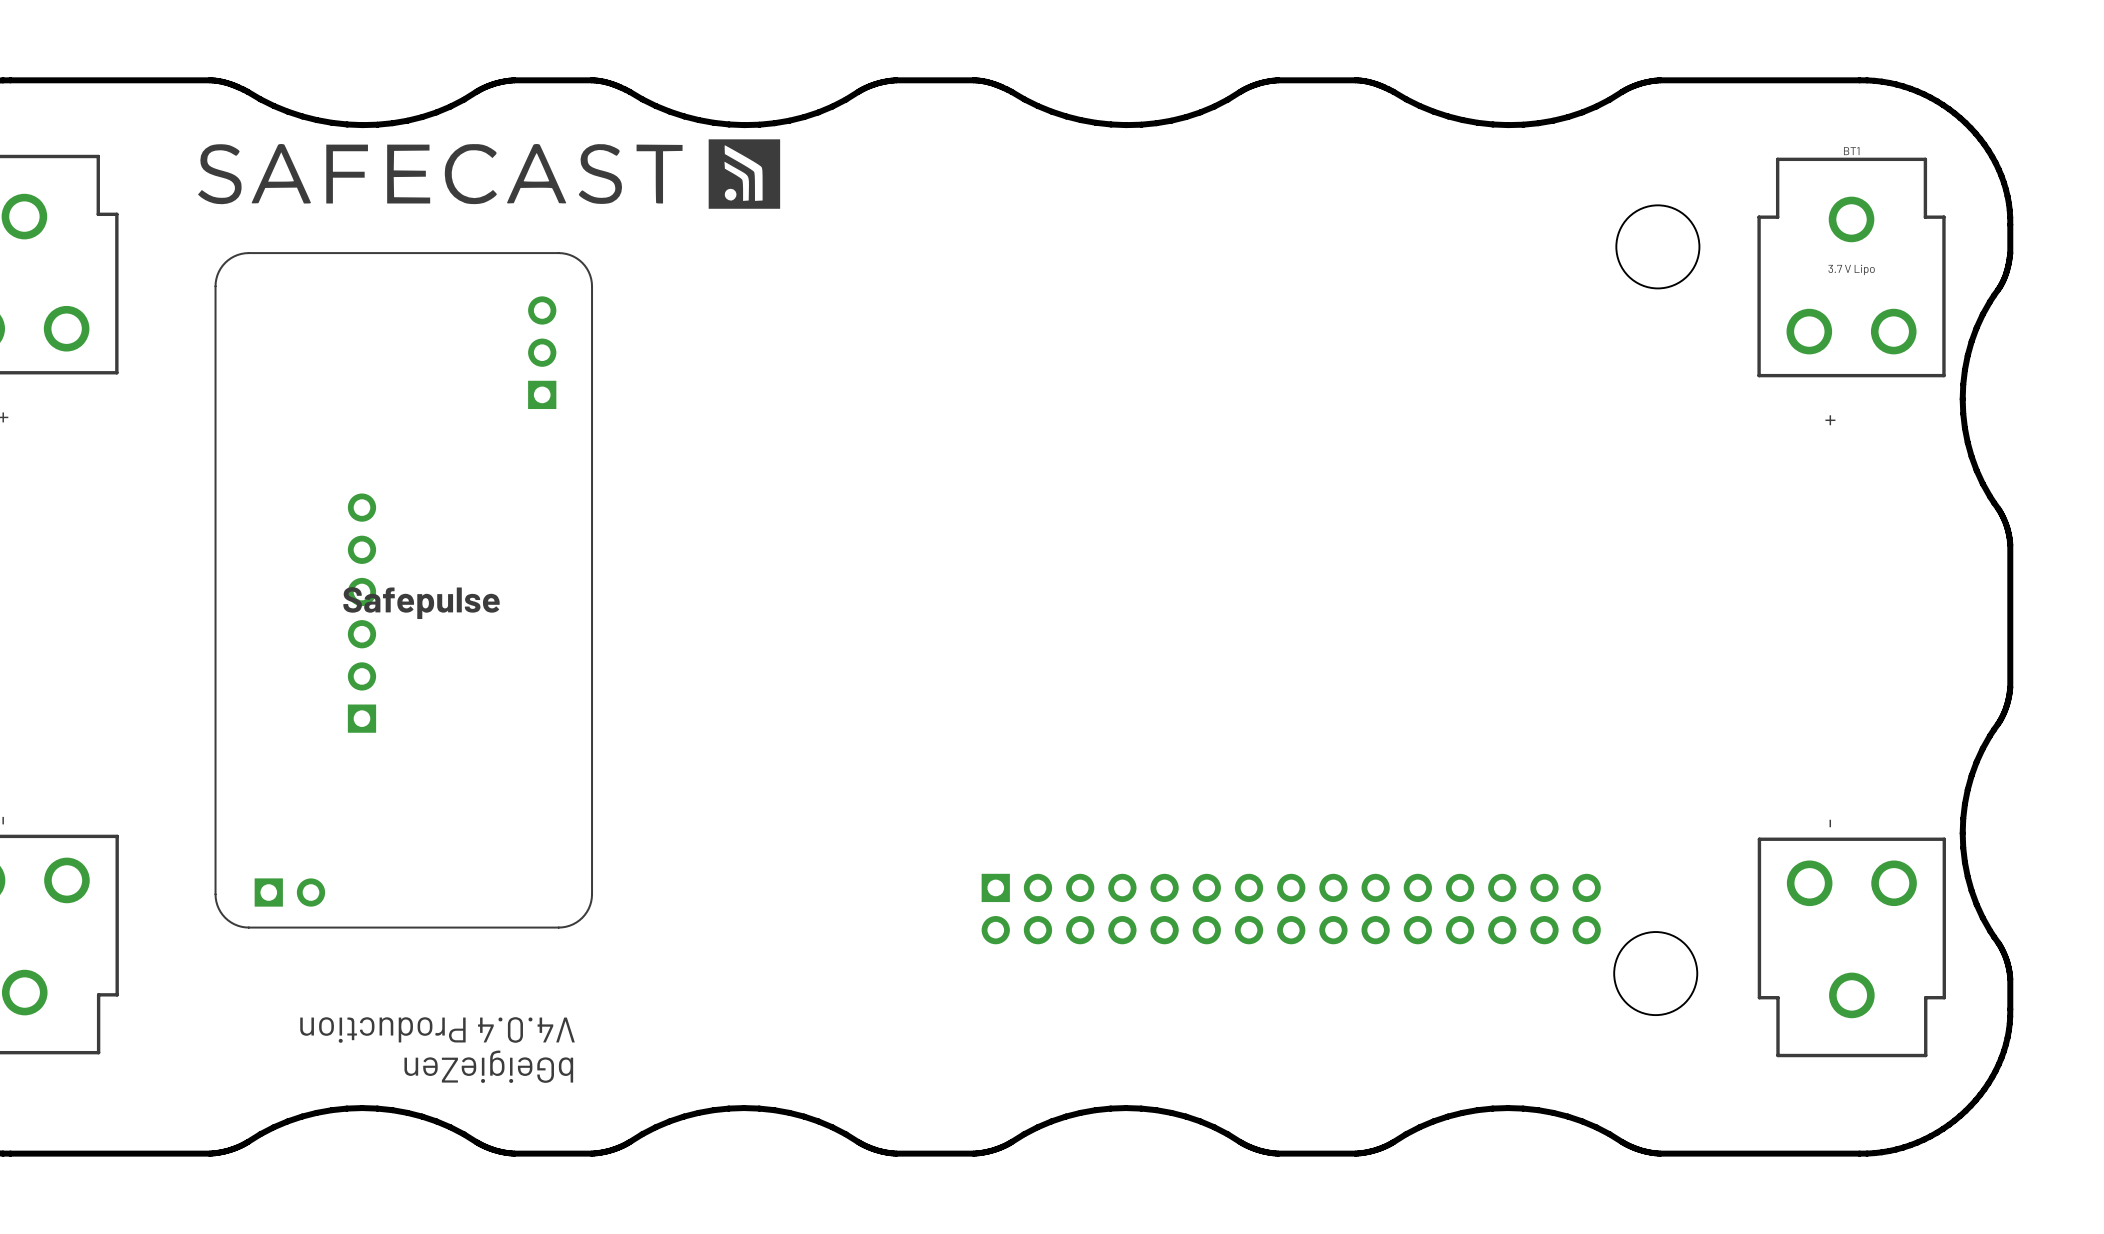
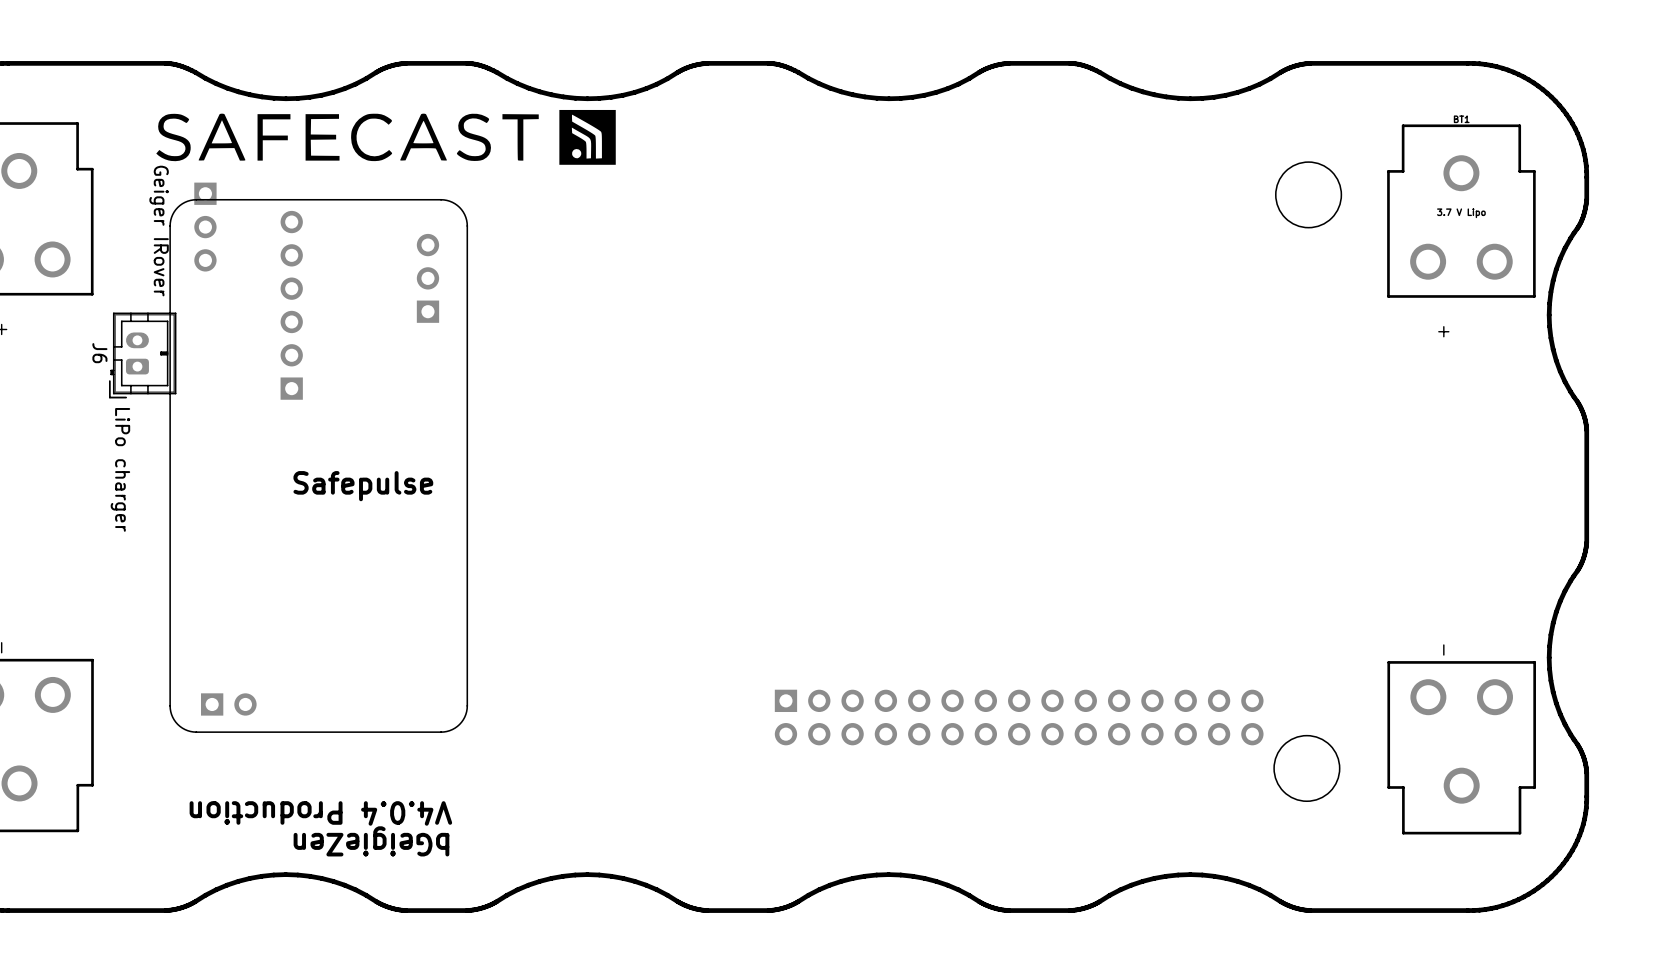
part: none -> Geiger IRover (205, 227)
J6: none -> LiPo charger (142, 355)
text position: Safepulse (421, 603) -> Safepulse (363, 486)
part position: (361, 613) -> (291, 305)

